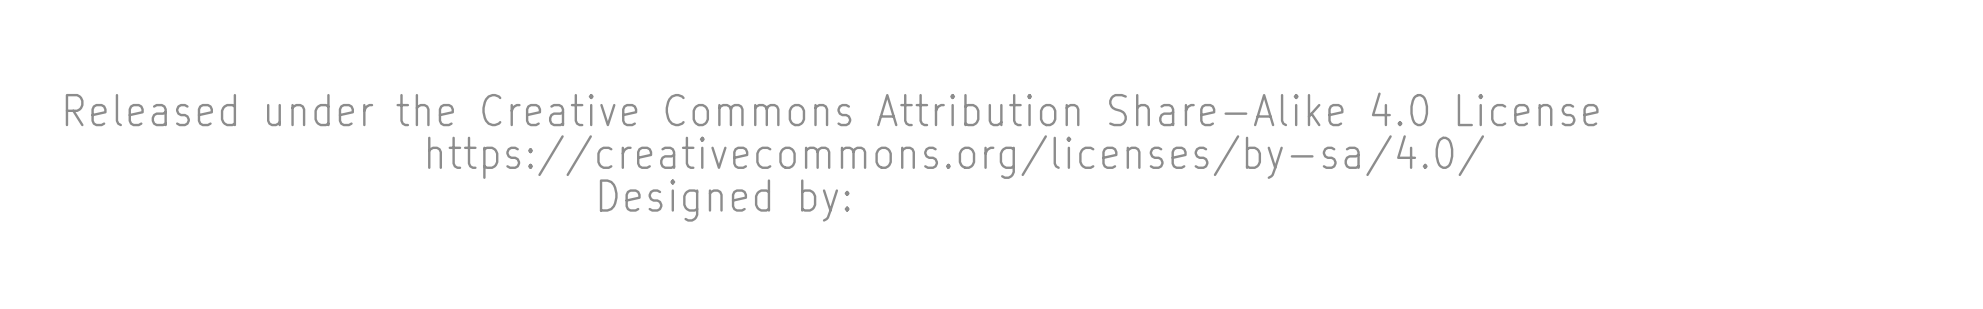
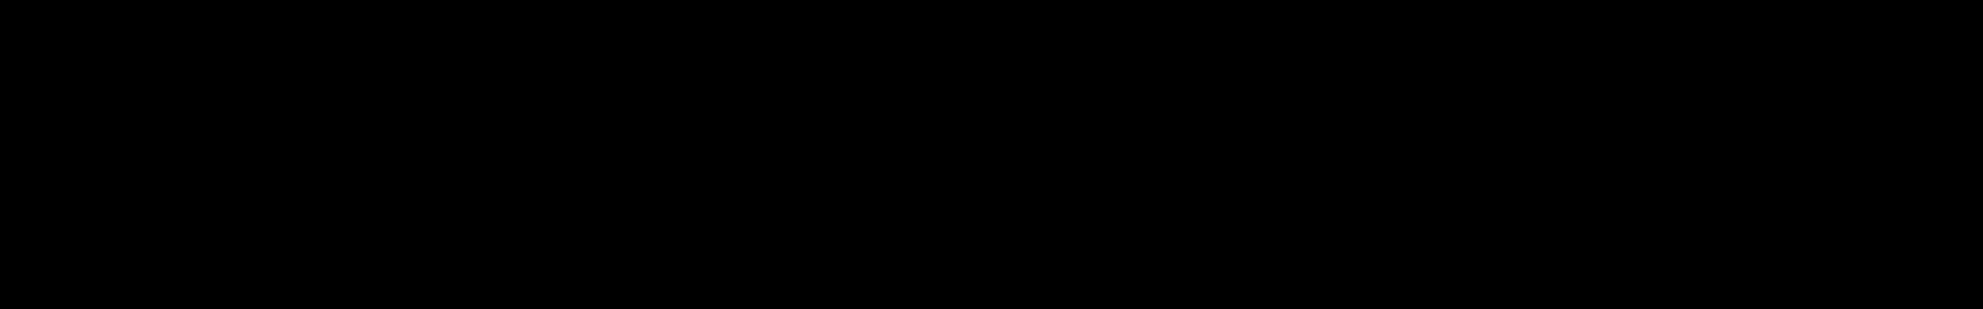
drawing: [65, 92, 1599, 222] -> none

